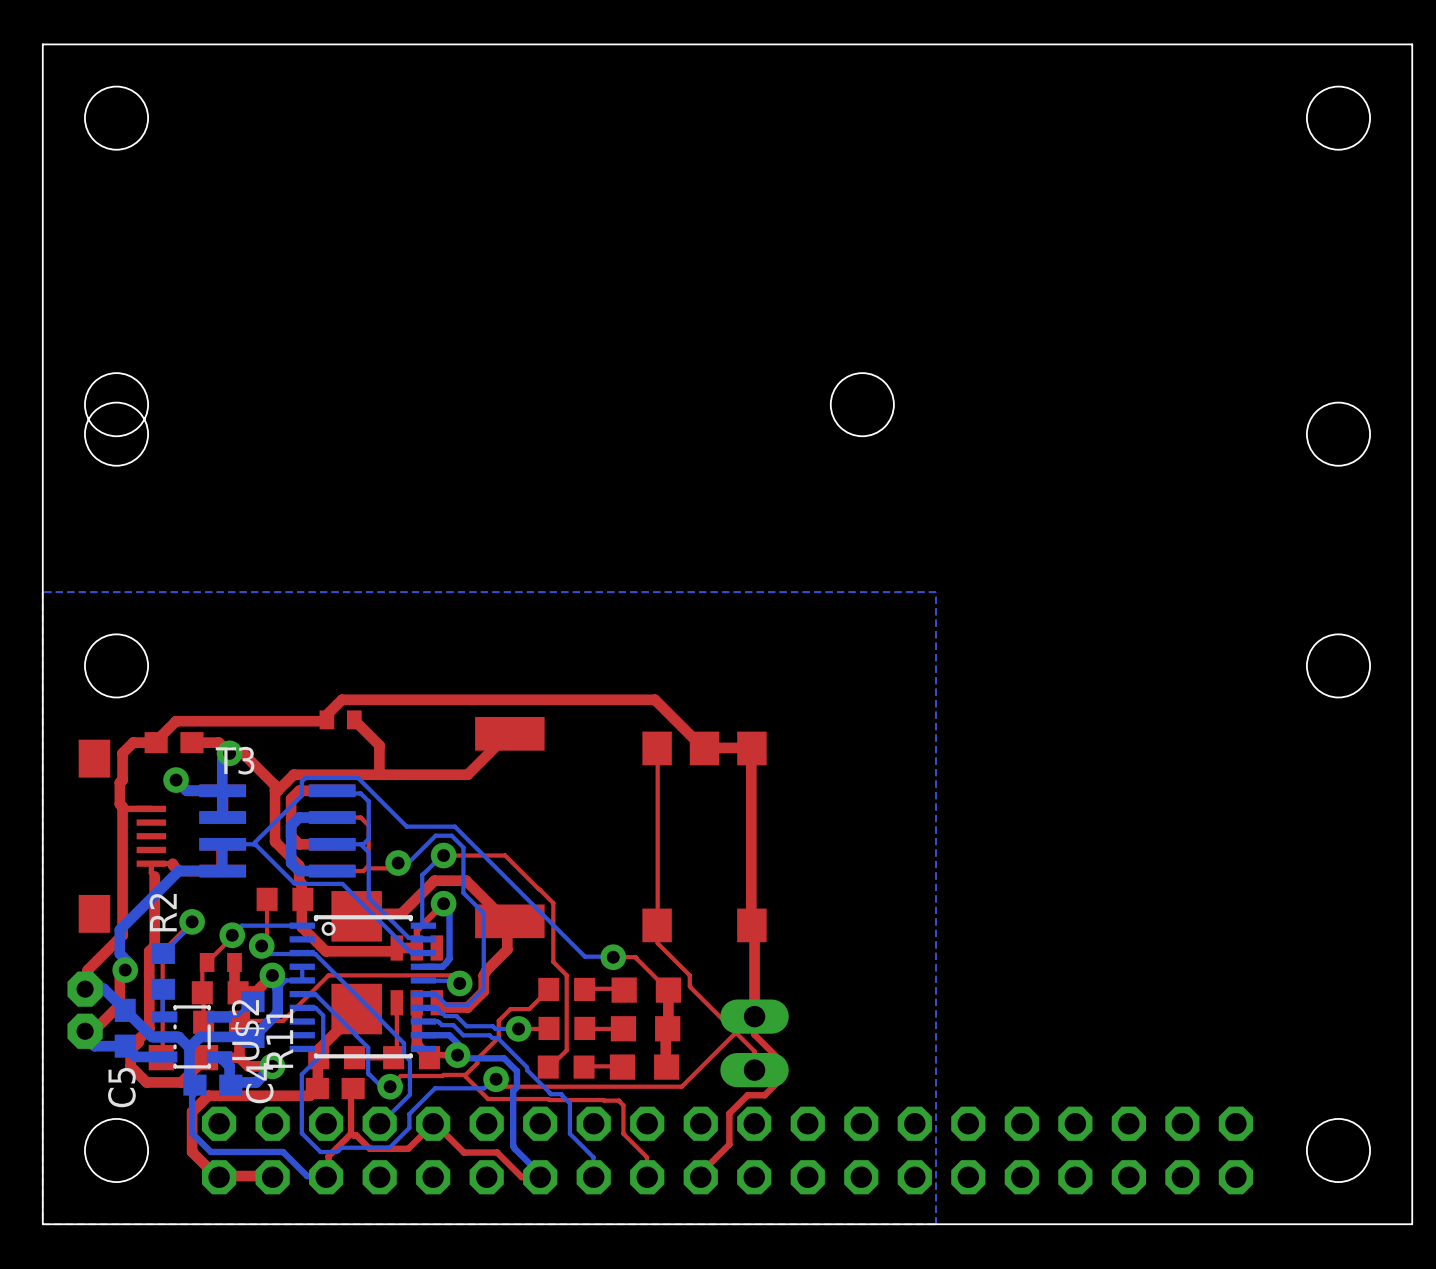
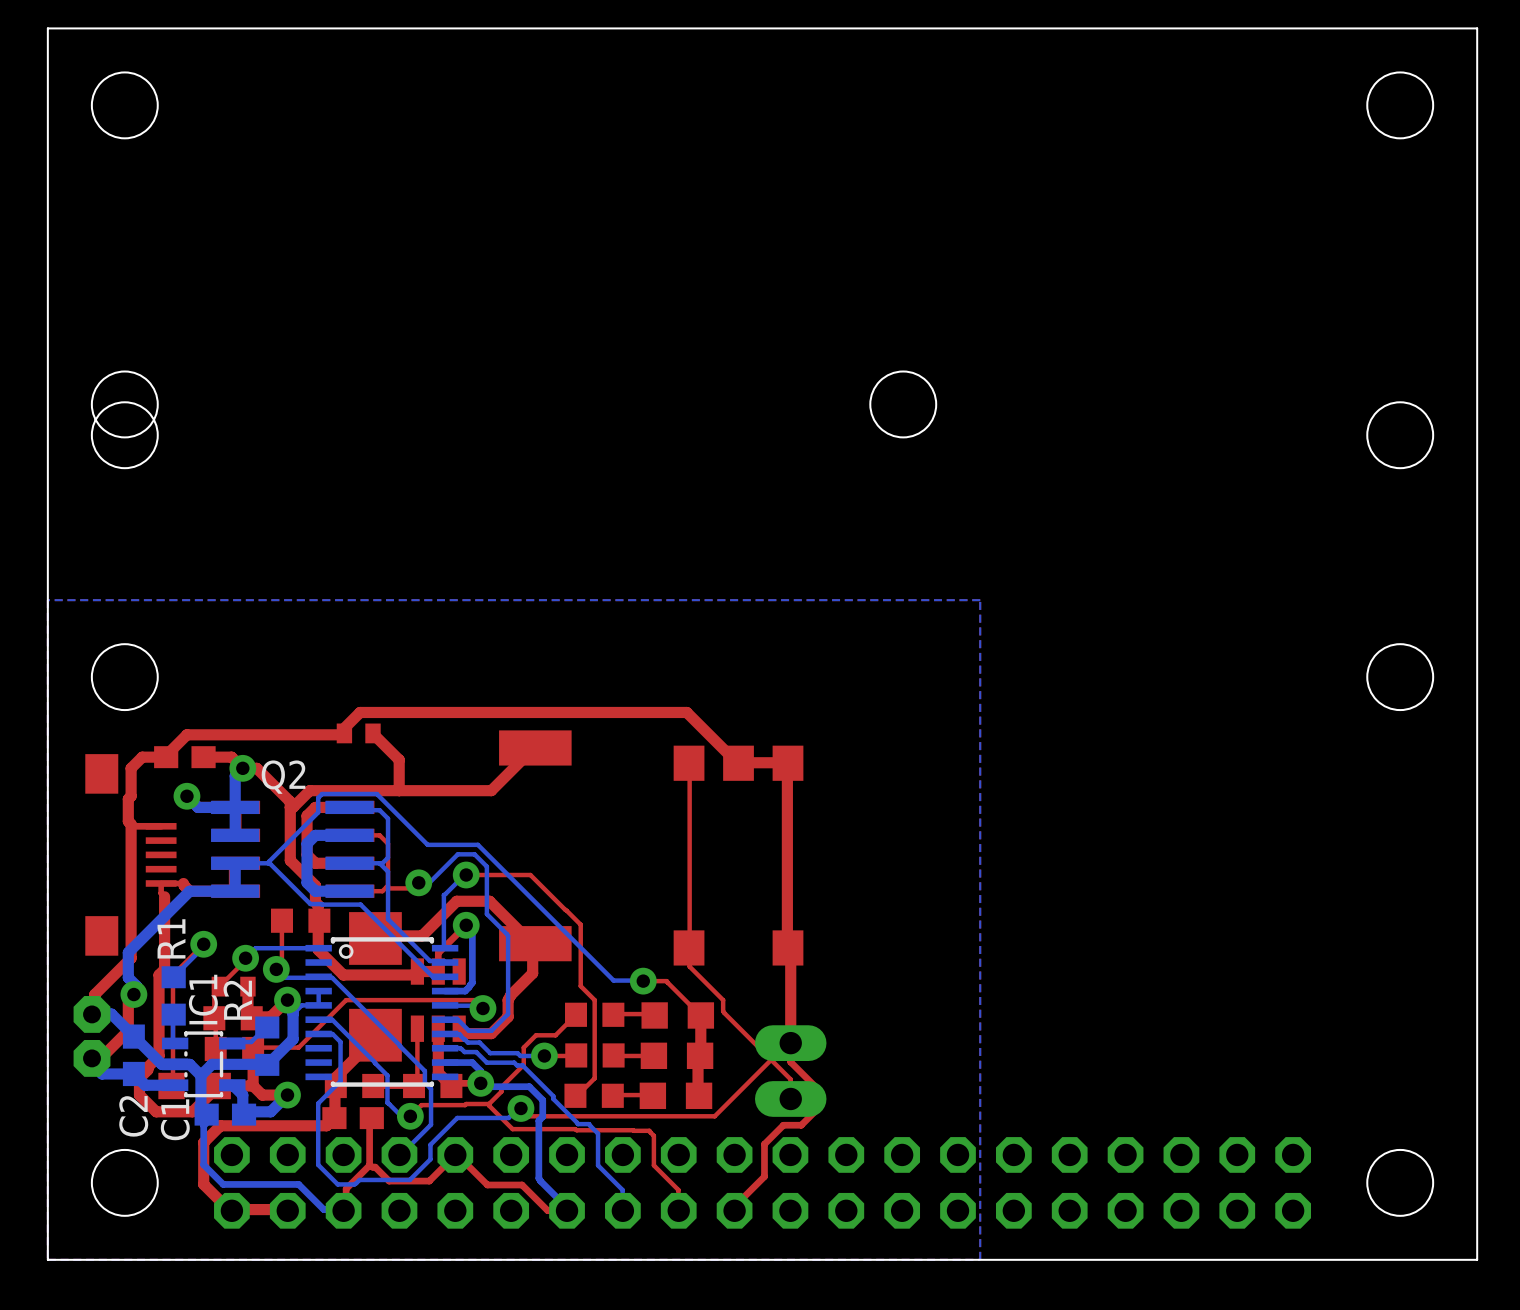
T3 name: T3 (235, 760) -> Q2 (283, 777)
R2 name: R2 (163, 912) -> R1 (171, 938)
U$2 name: U$2 (247, 1030) -> IC1 (203, 999)
R11 name: R11 (279, 1038) -> R2 (237, 1000)
C4 name: C4 (259, 1083) -> C1 (175, 1119)
C5 name: C5 (121, 1087) -> C2 (133, 1116)

